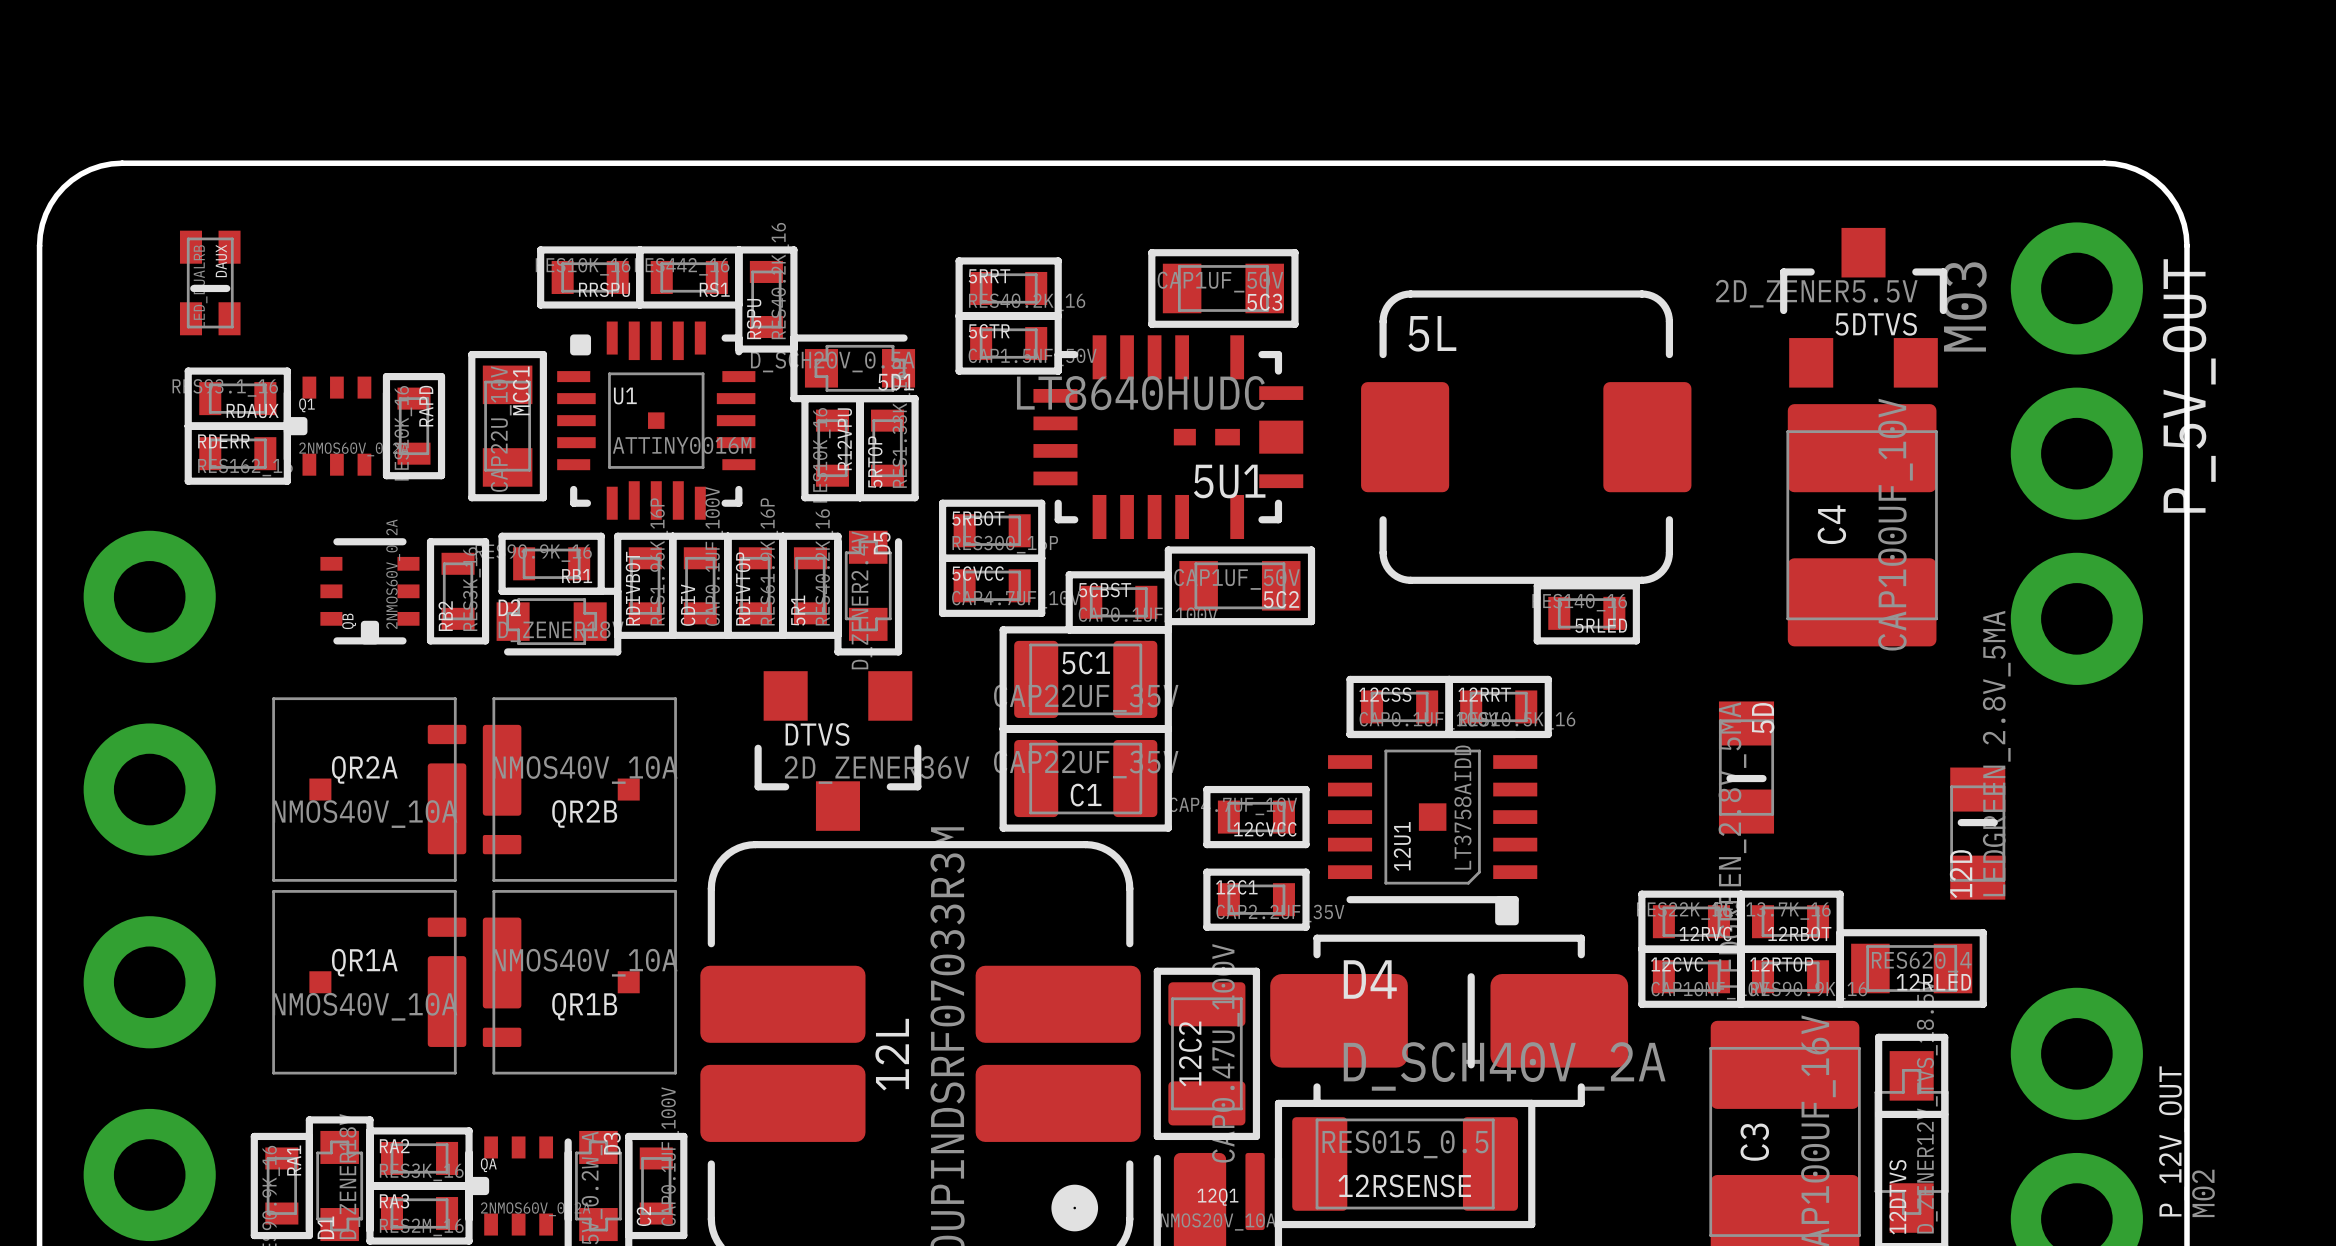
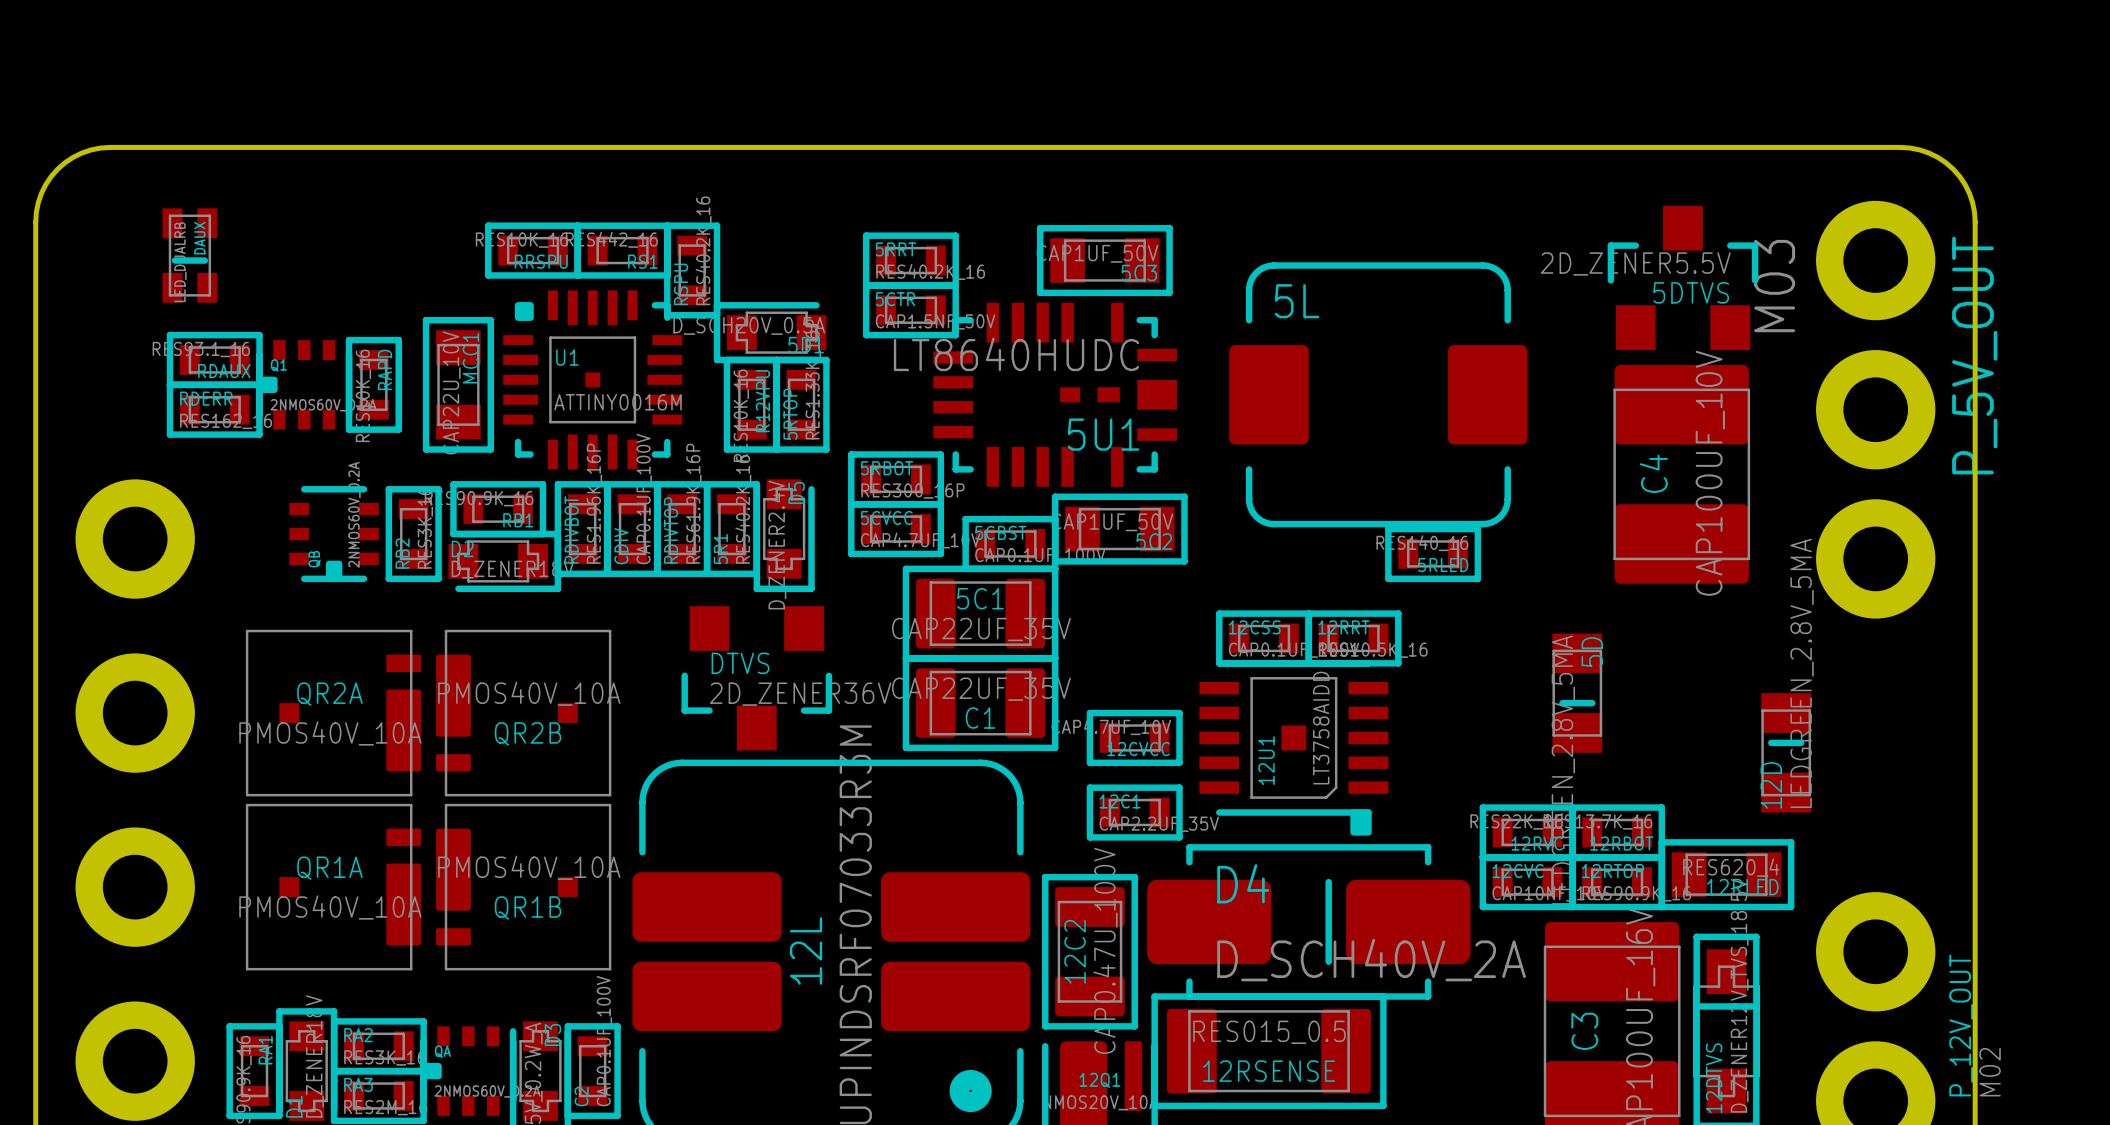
QR2B value: NMOS40V_10A (585, 770) -> PMOS40V_10A (529, 693)
QR2A value: NMOS40V_10A (365, 814) -> PMOS40V_10A (330, 733)
QR1B value: NMOS40V_10A (585, 962) -> PMOS40V_10A (529, 867)
QR1A value: NMOS40V_10A (365, 1006) -> PMOS40V_10A (330, 907)

